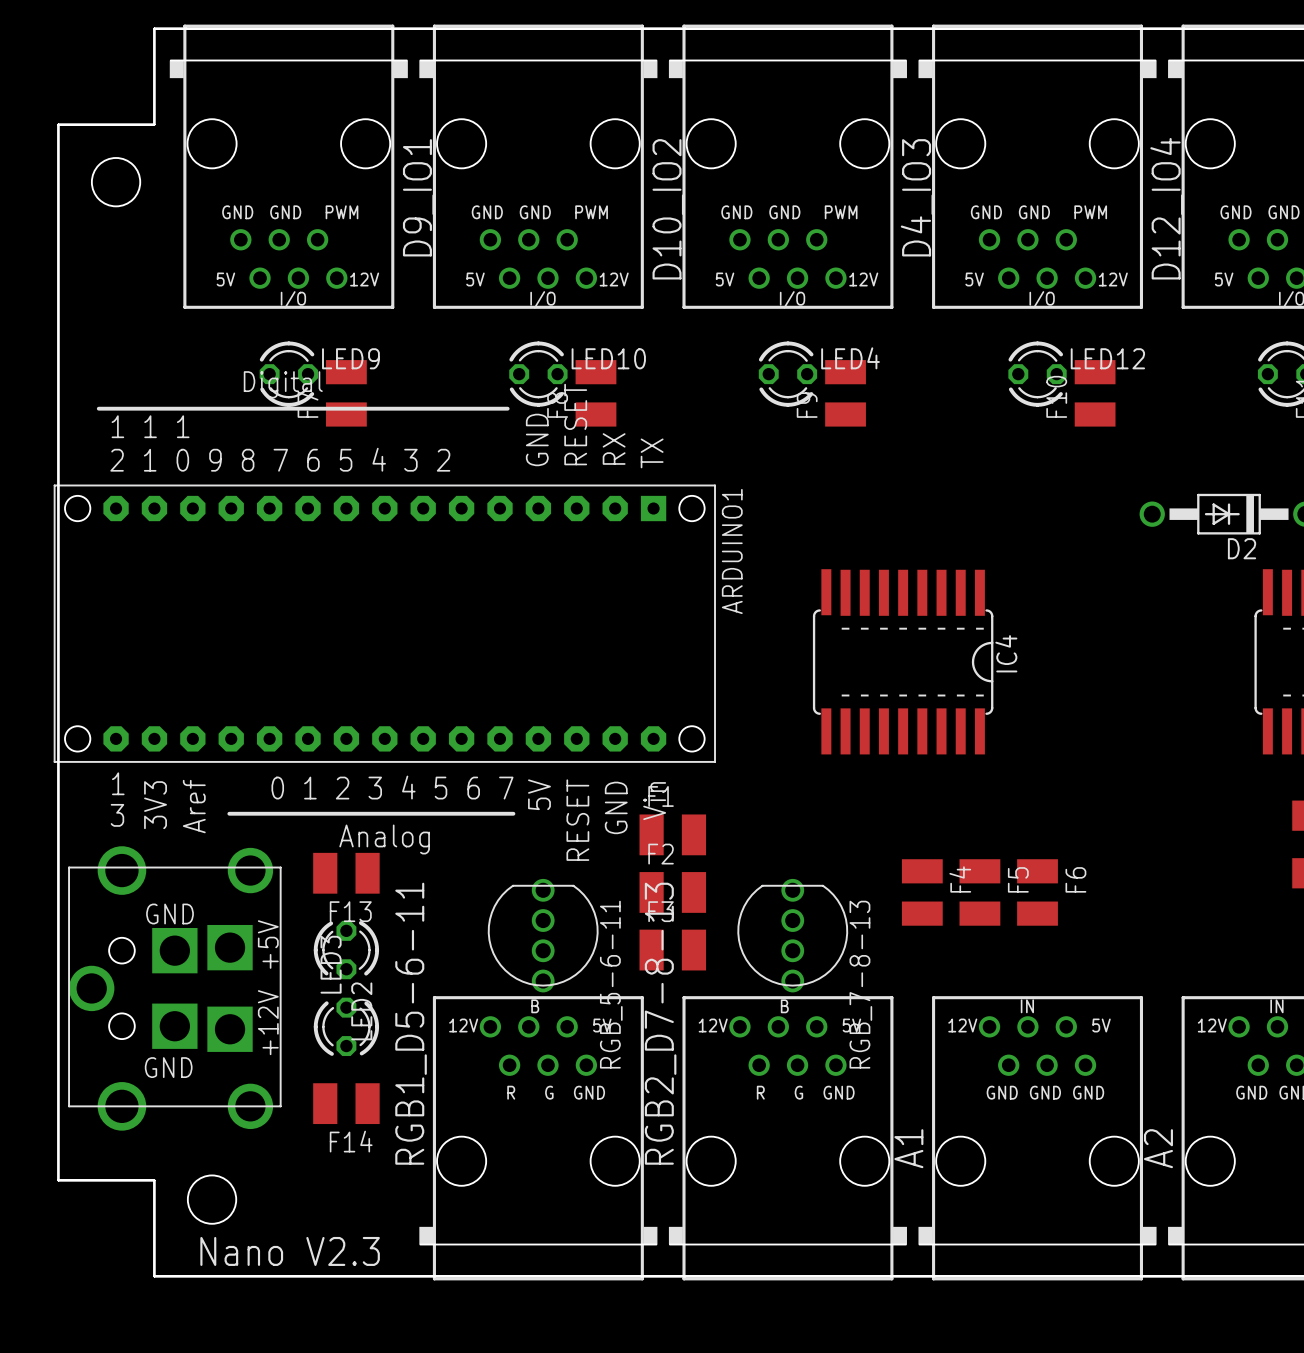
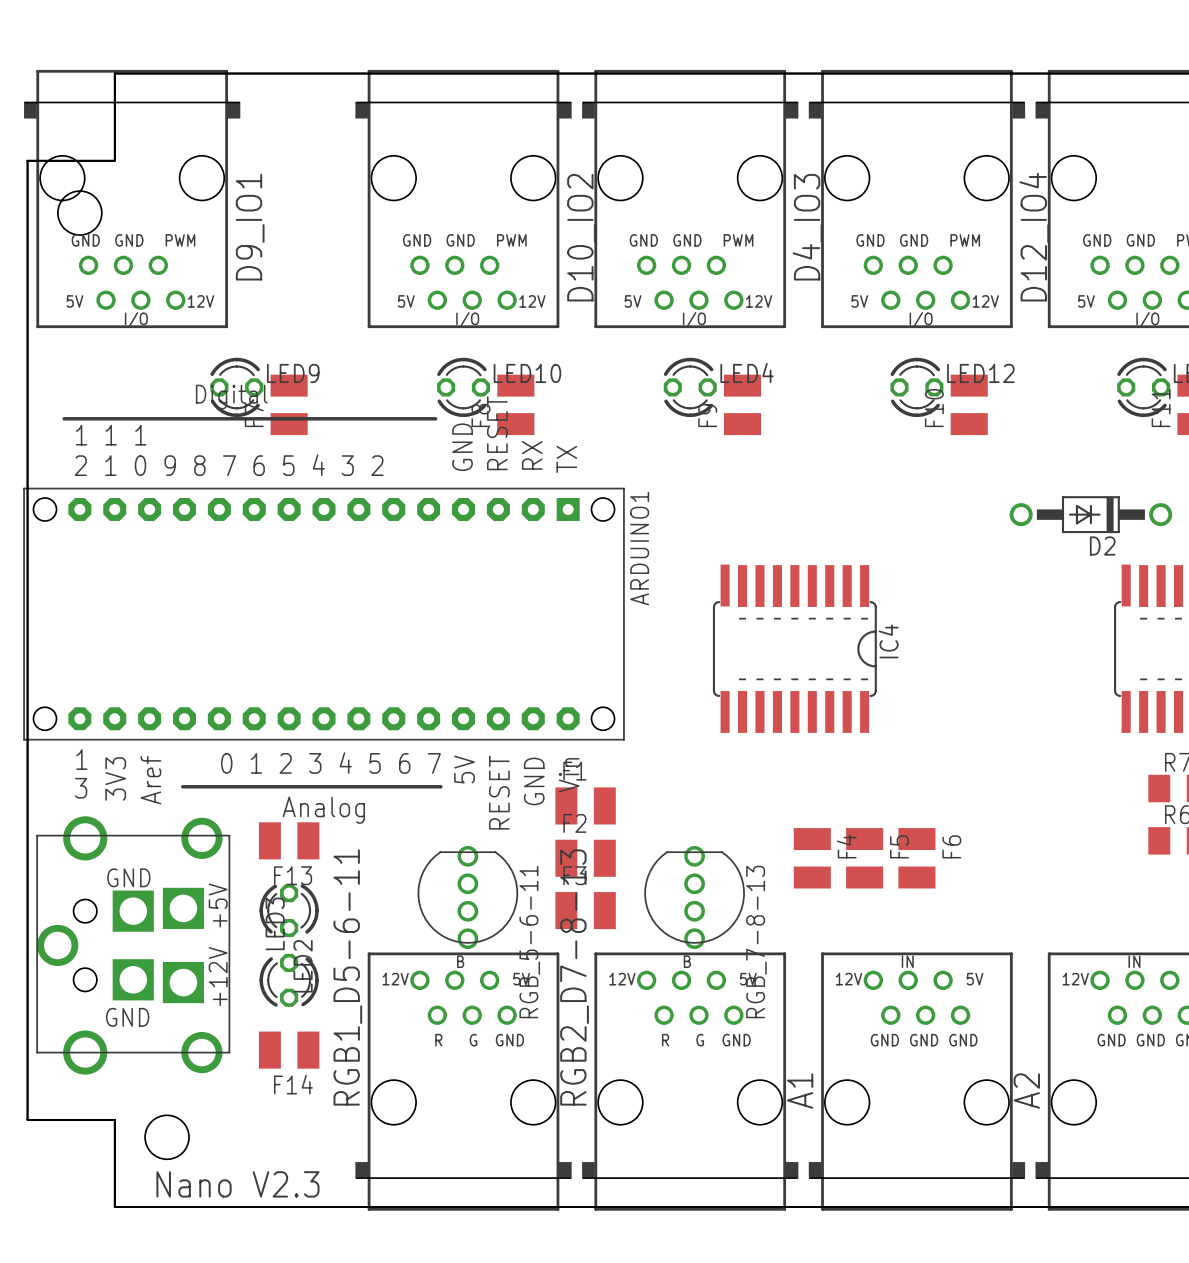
D9_IO1 position: (288, 166) -> (132, 199)

